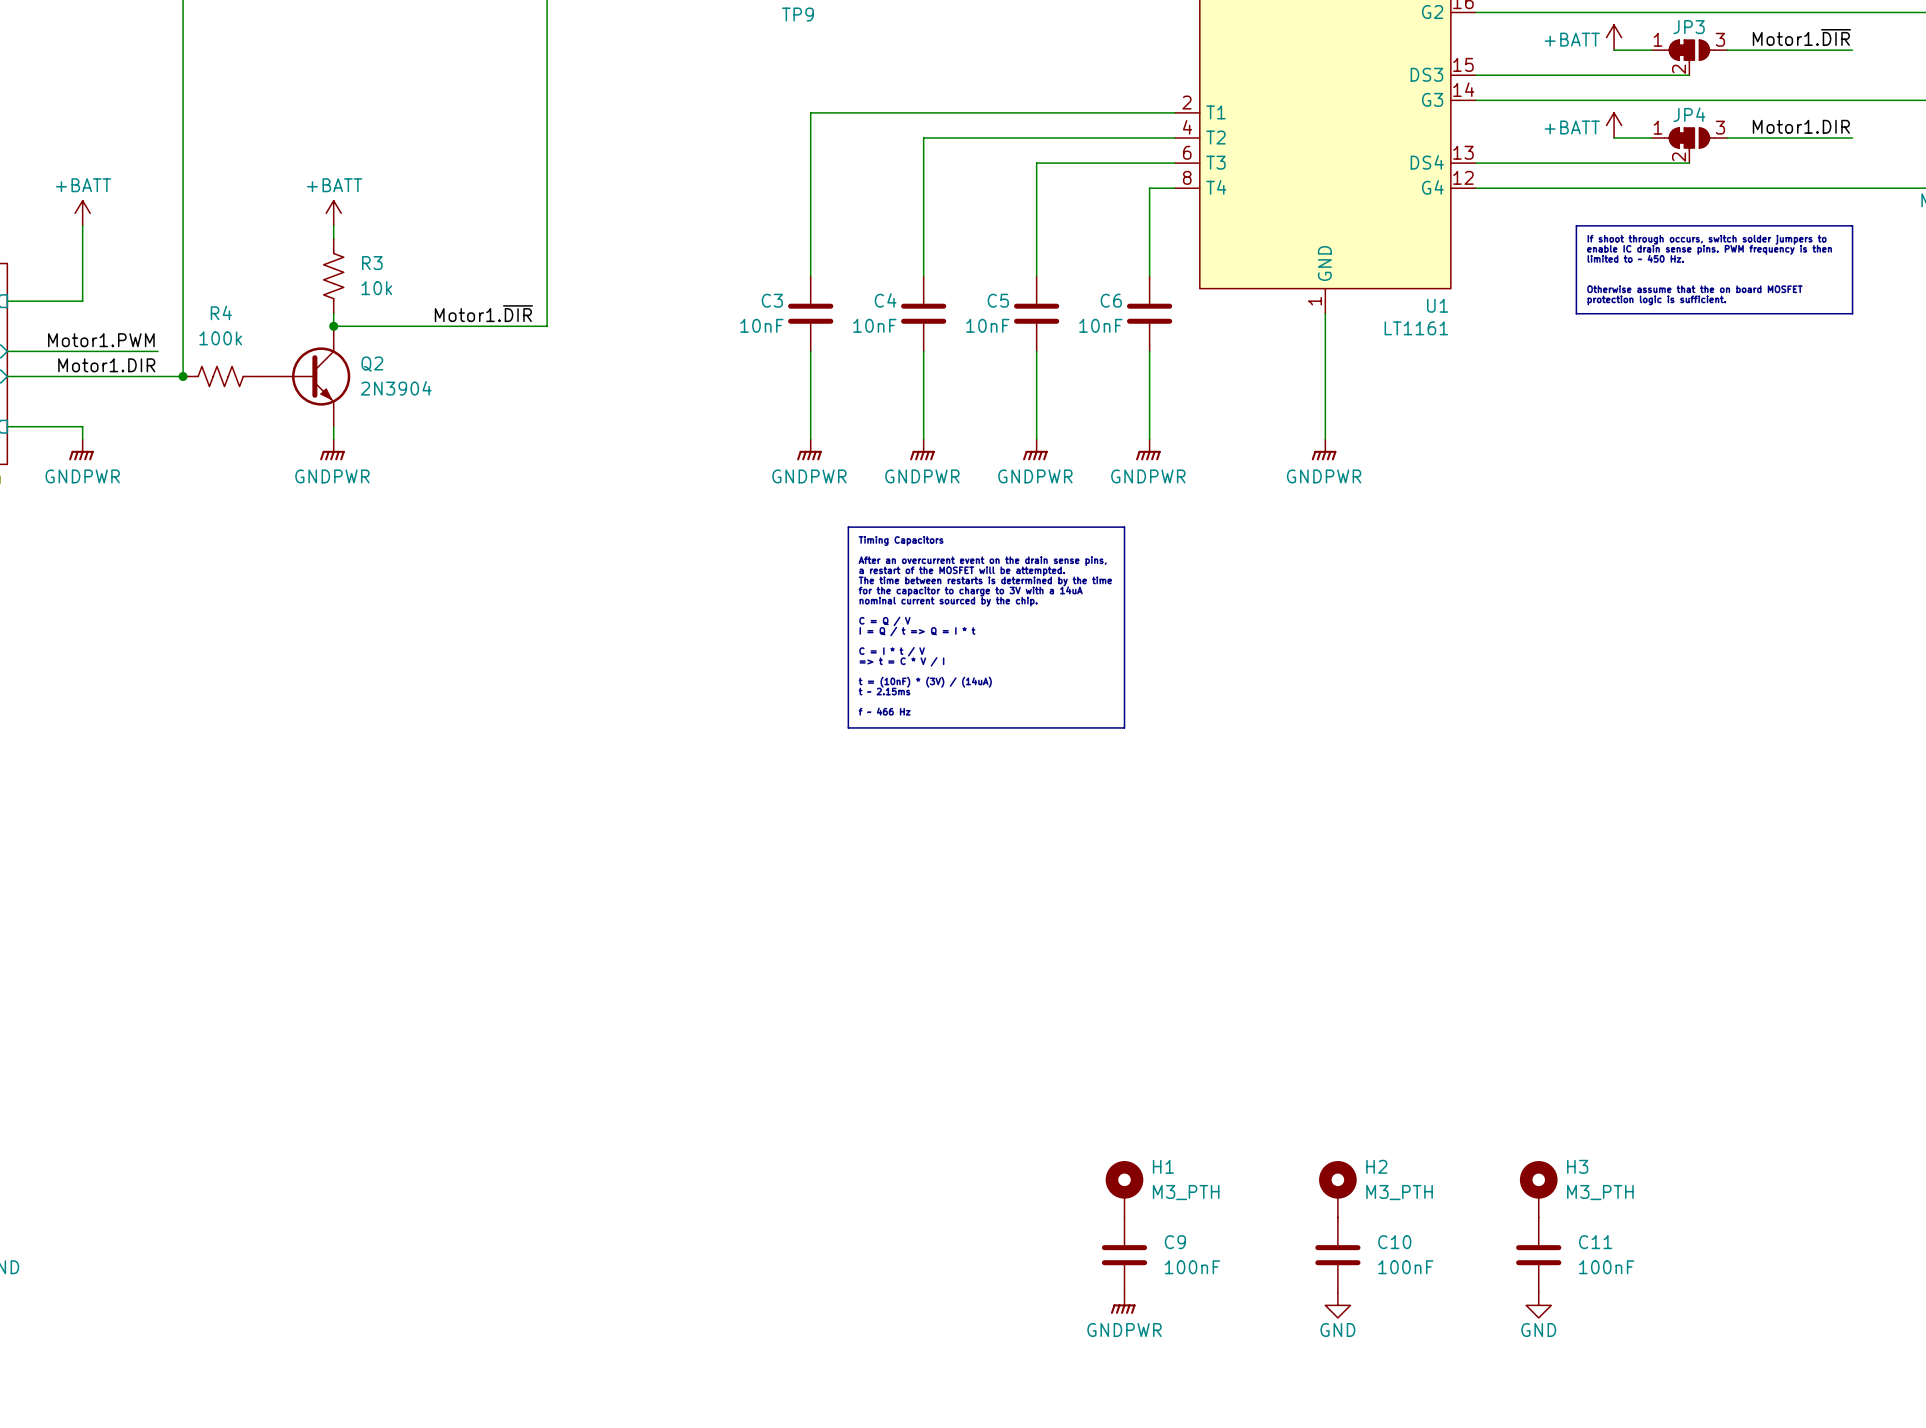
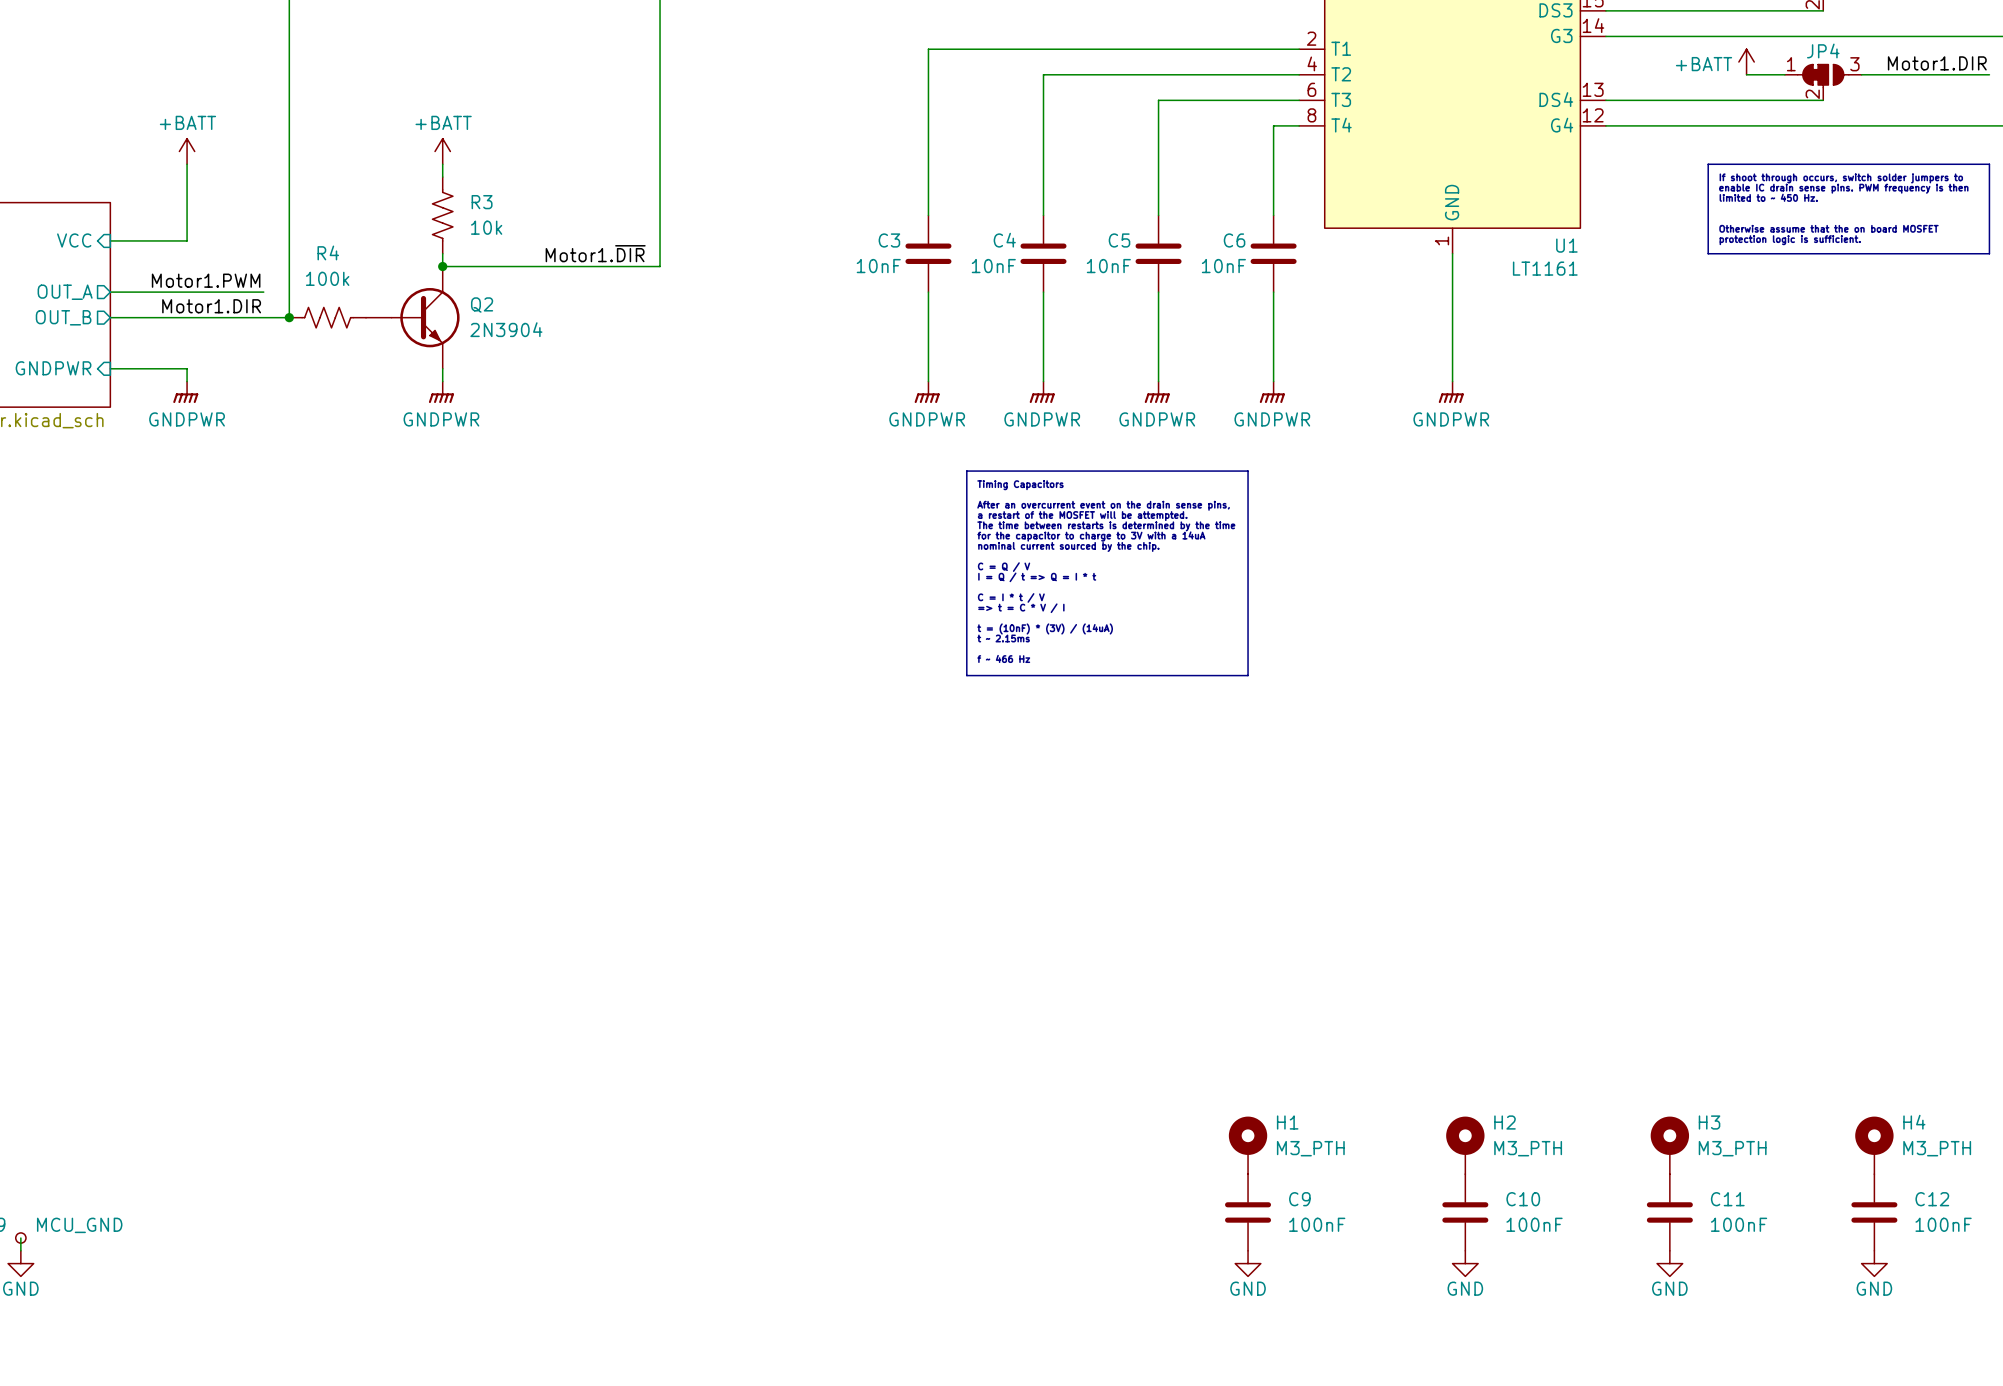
H4: none -> M3_PTH (1874, 1145)
C12: none -> 100nF (1874, 1212)
power symbol: GNDPWR (1123, 1303) -> GND (1248, 1263)
power symbol: none -> GND (1874, 1263)

